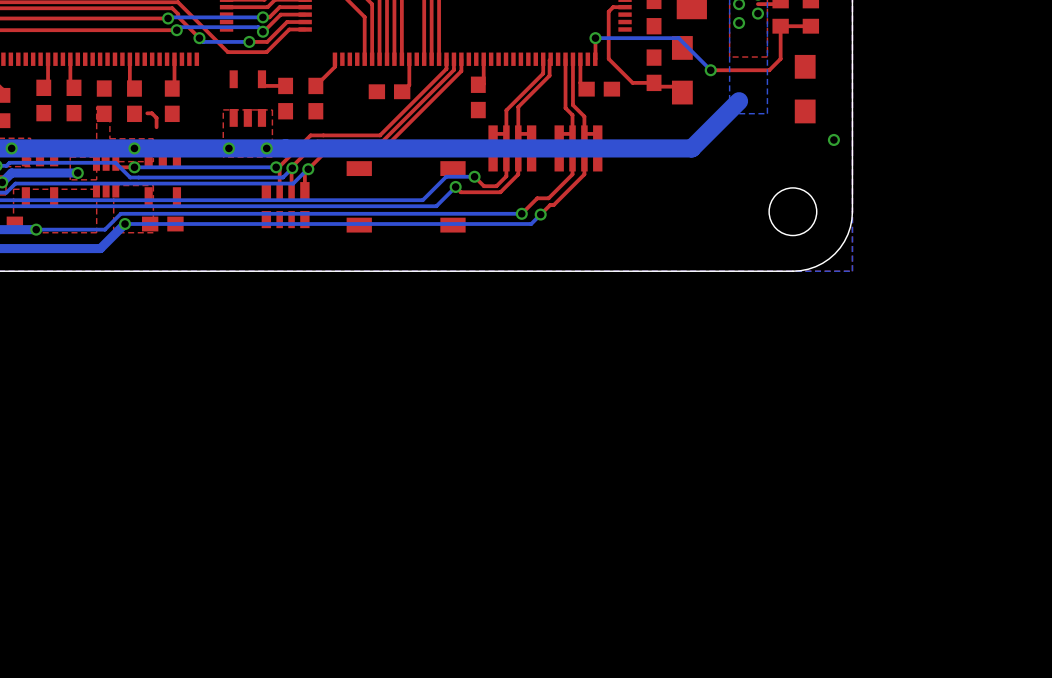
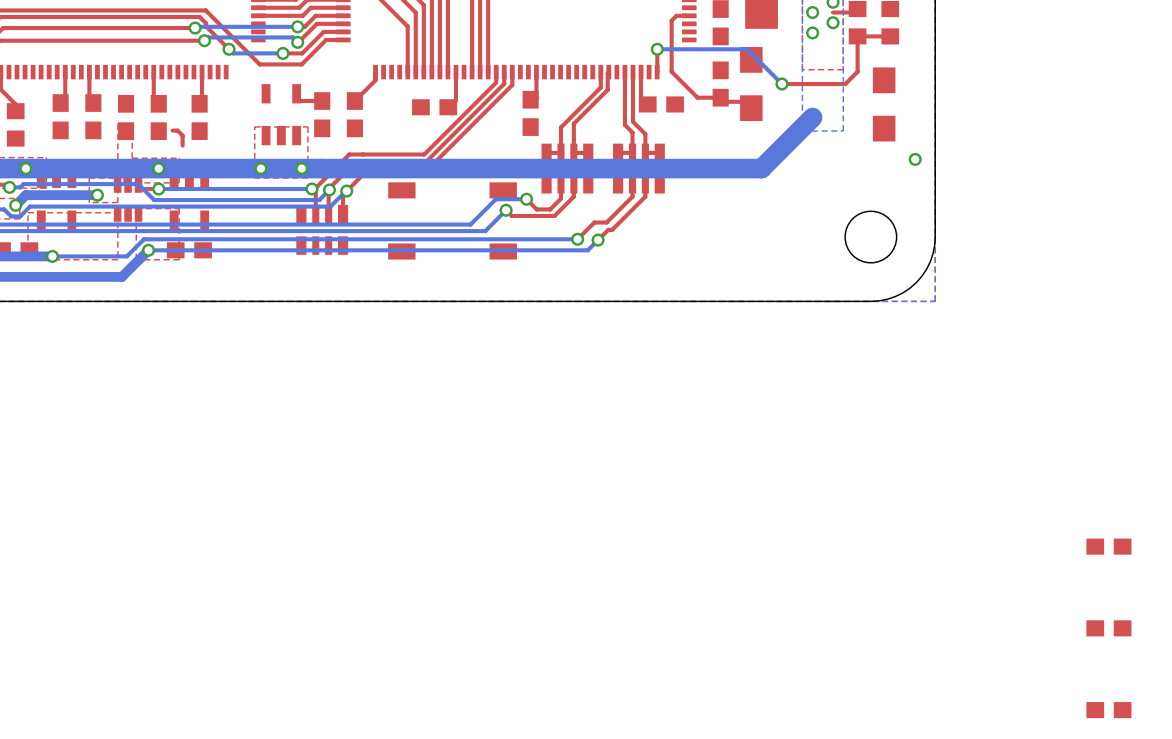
part: none -> (1108, 546)
part: none -> (1108, 628)
part: none -> (1108, 710)

